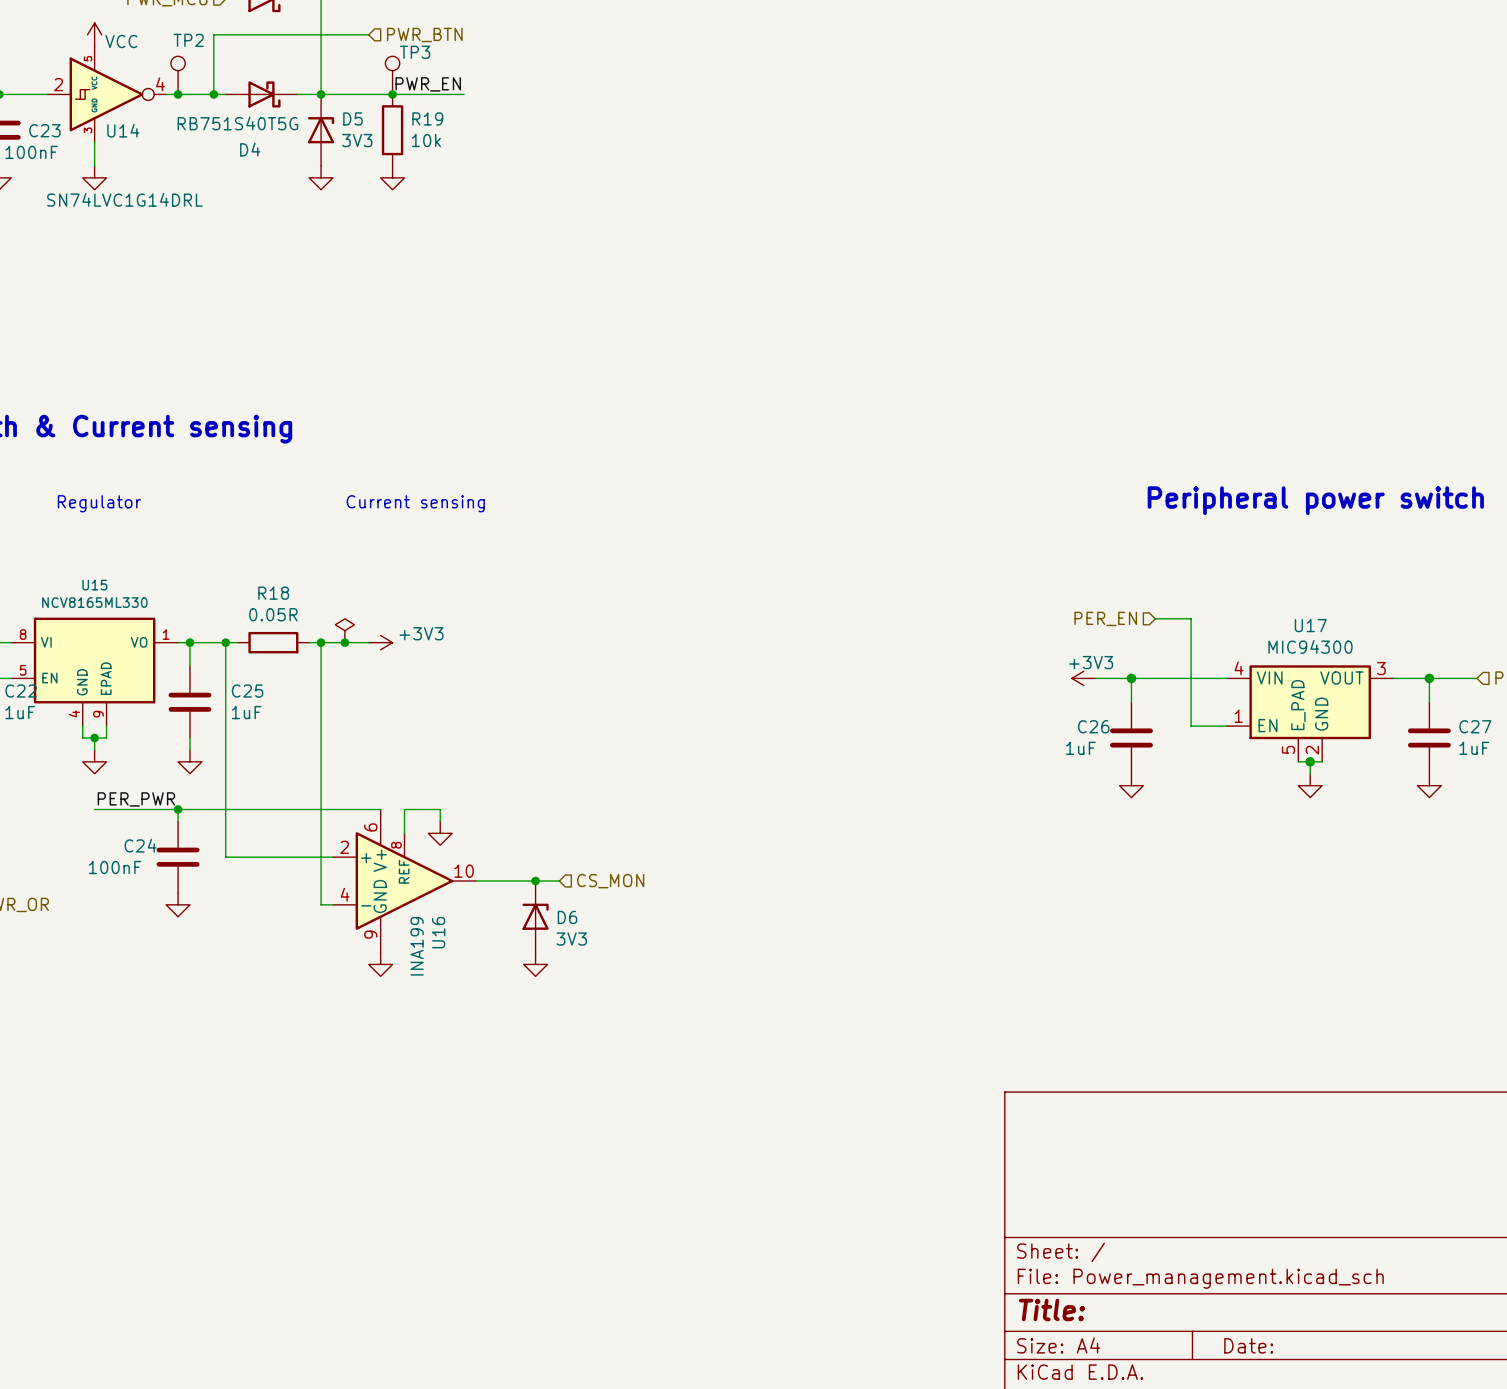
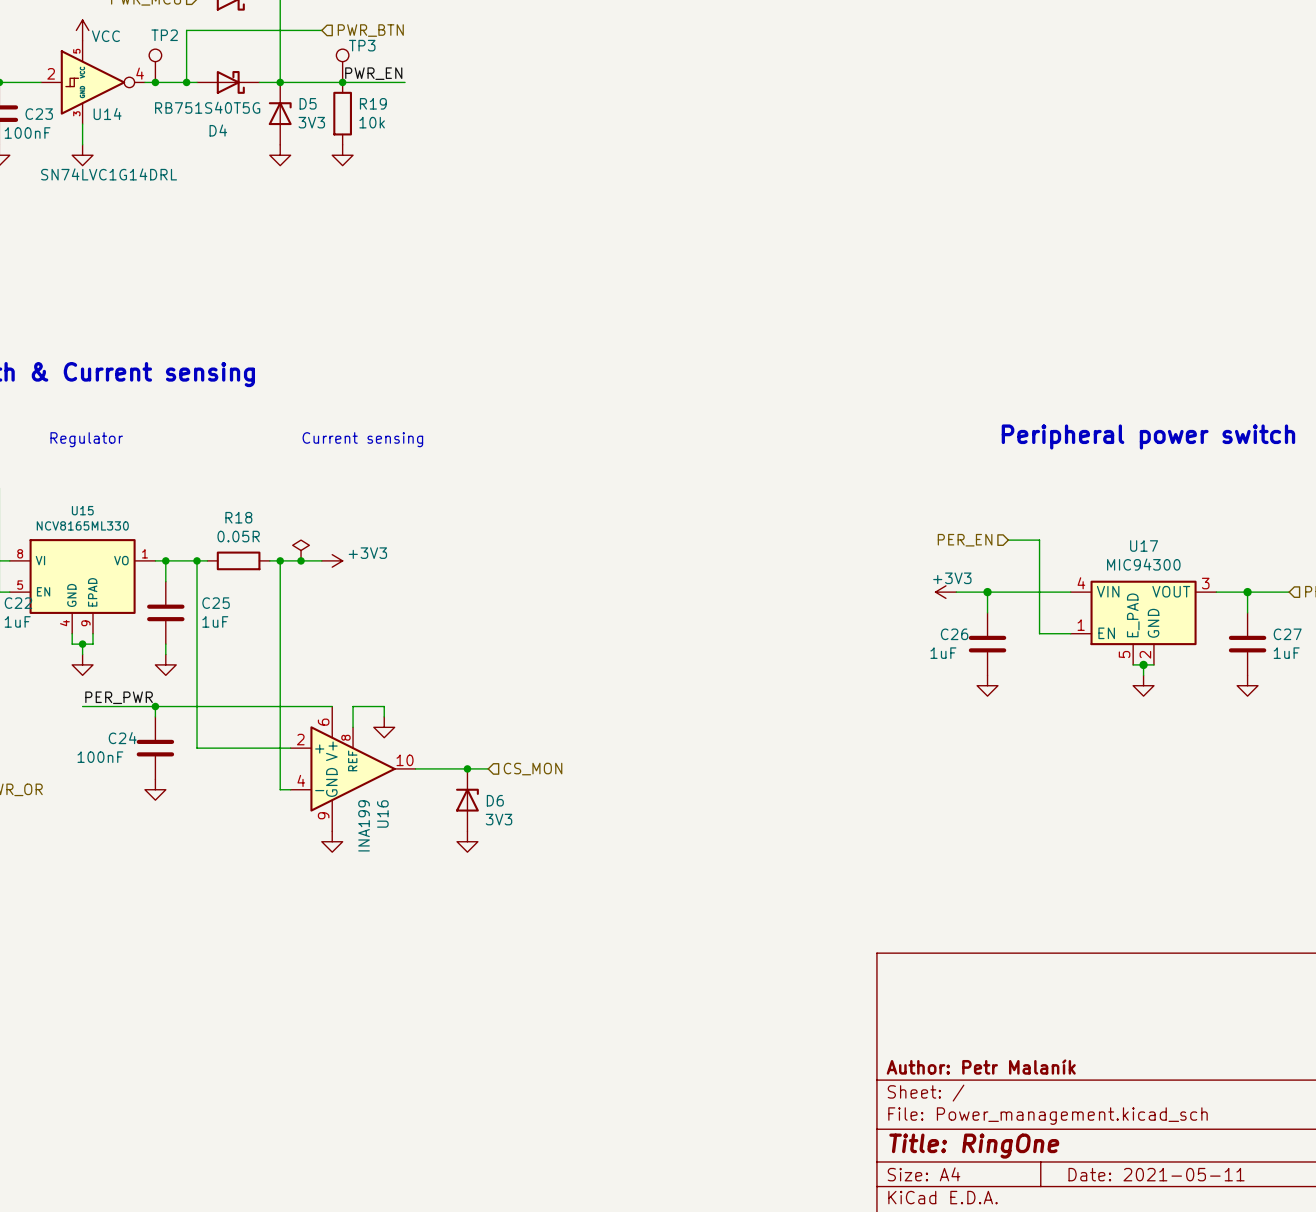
title block: none -> Author: Petr Malaník (981, 1067)
title block: Title: (1051, 1309) -> Title: RingOne (974, 1146)
title block: Date: (1248, 1345) -> Date: 2021-05-11 (1156, 1174)

